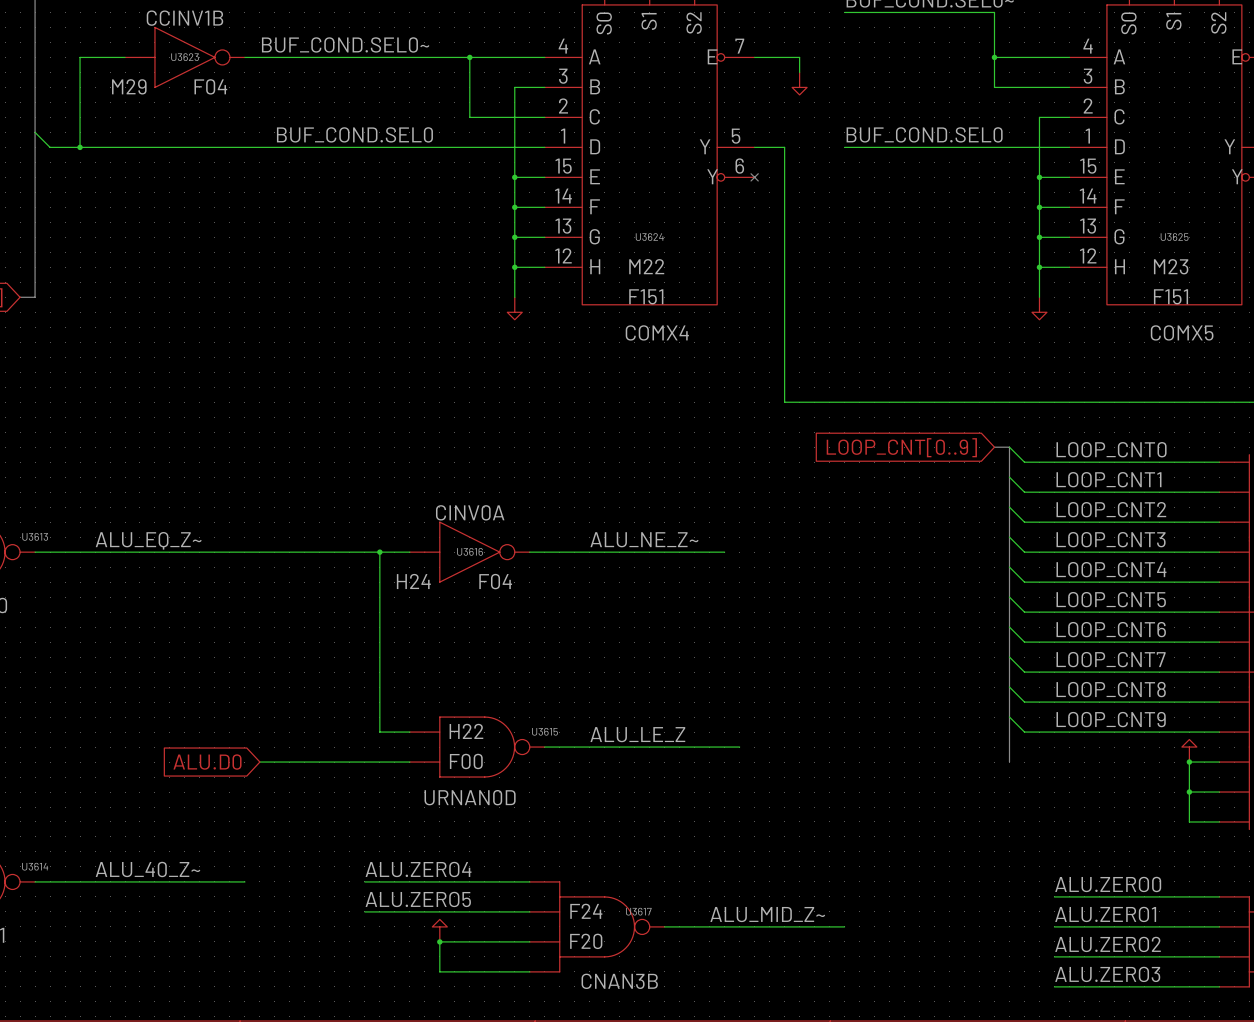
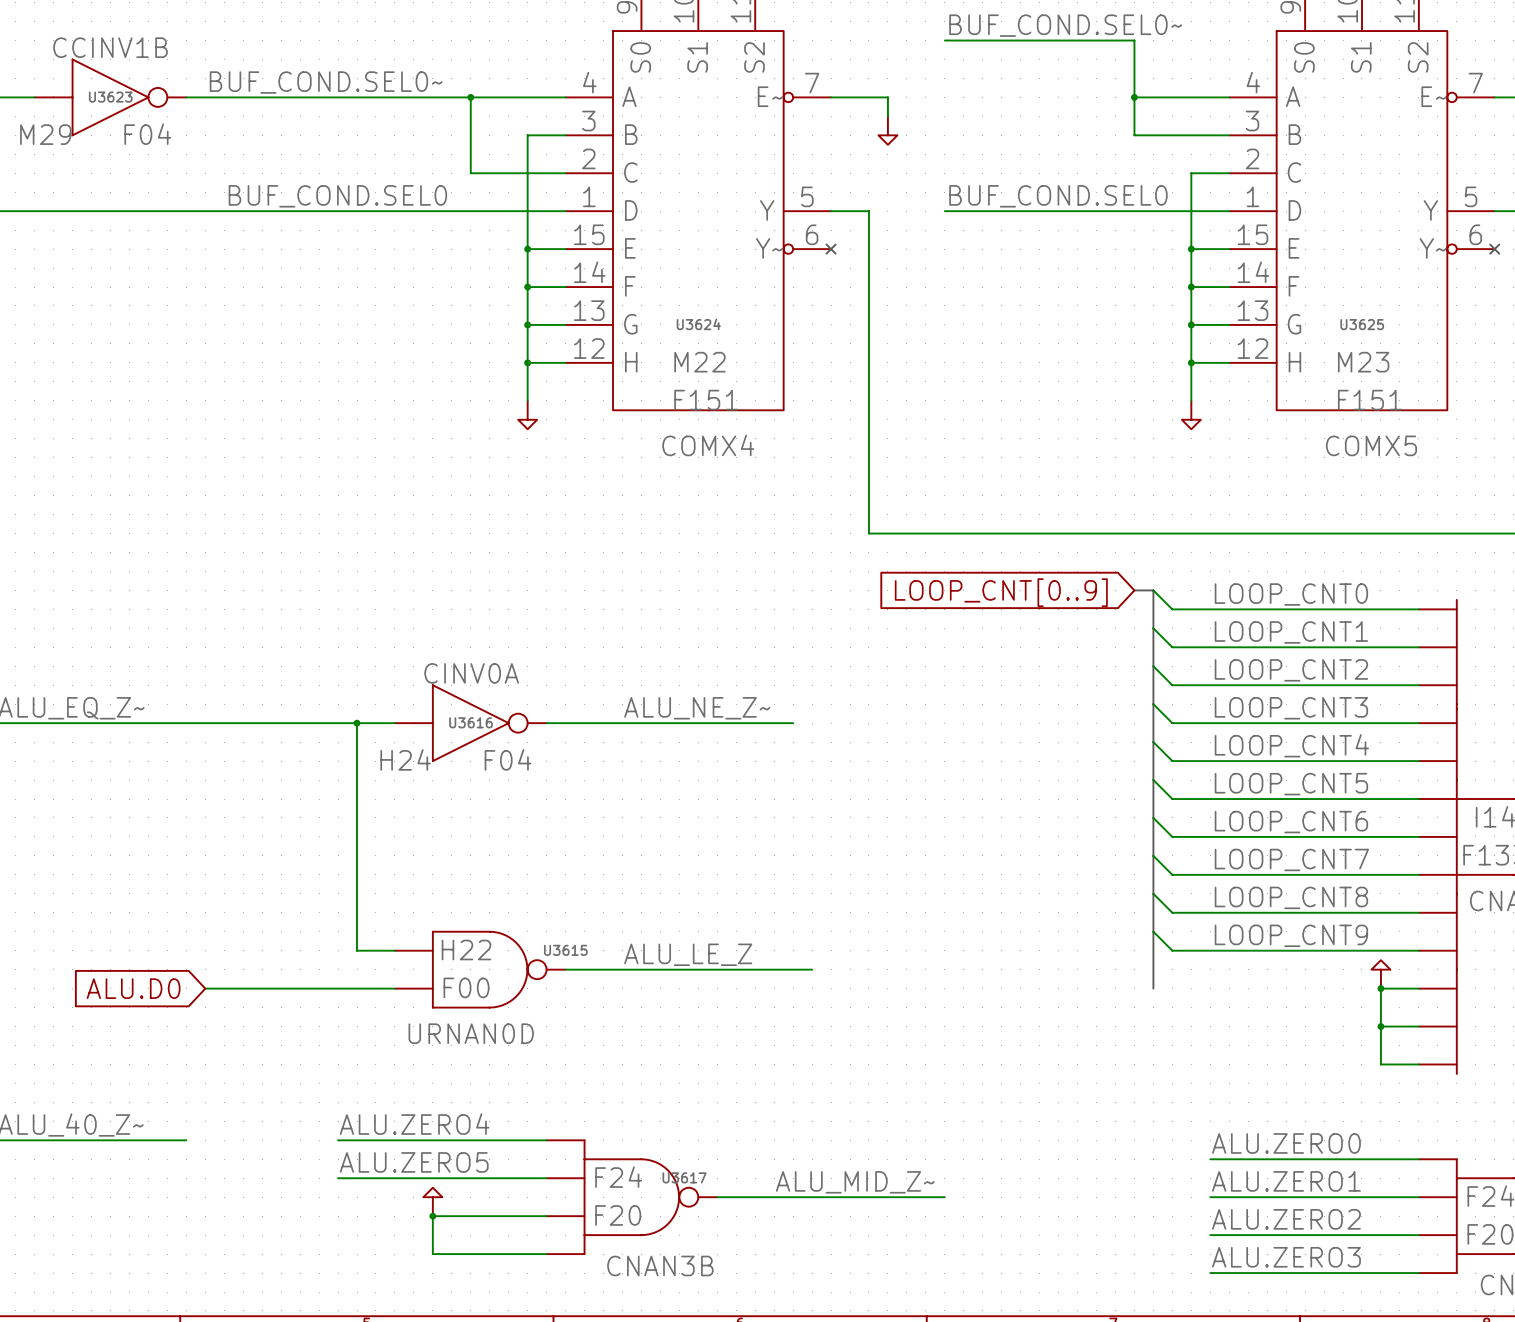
U3624 pin name: E (712, 56) -> E~ (770, 96)
U3625 pin name: E (1237, 56) -> E~ (1434, 96)
U3624 pin name: Y (712, 176) -> Y~ (769, 248)
U3625 pin name: Y (1237, 176) -> Y~ (1433, 248)

